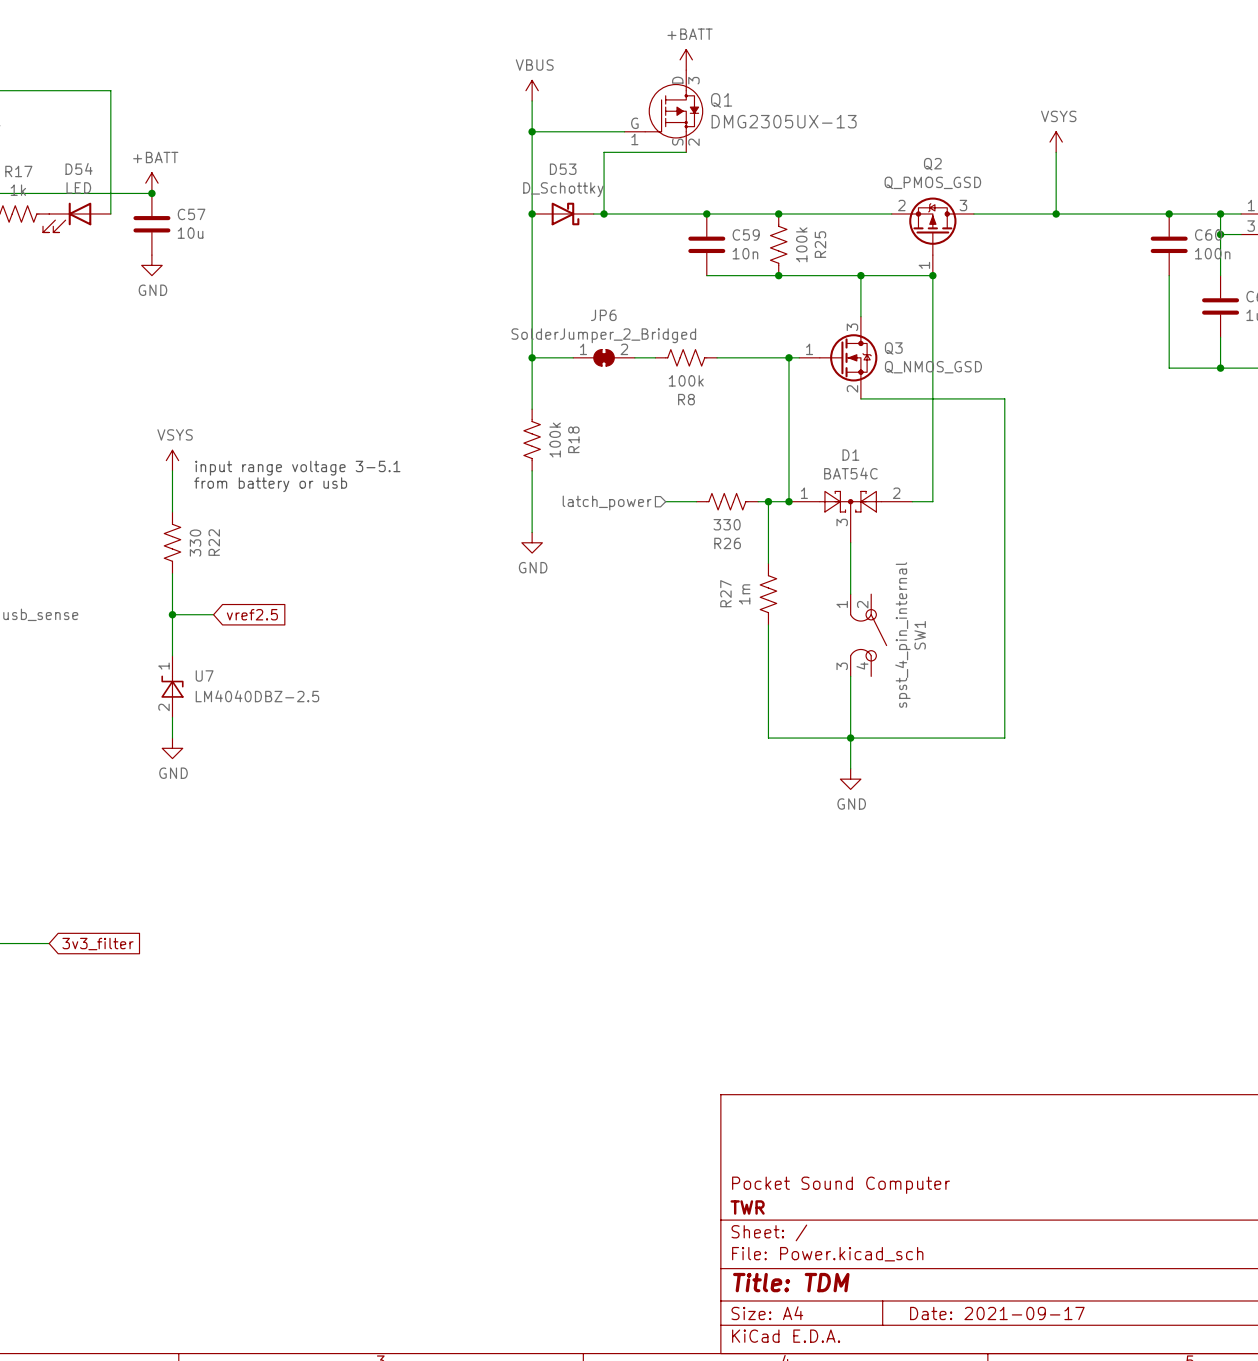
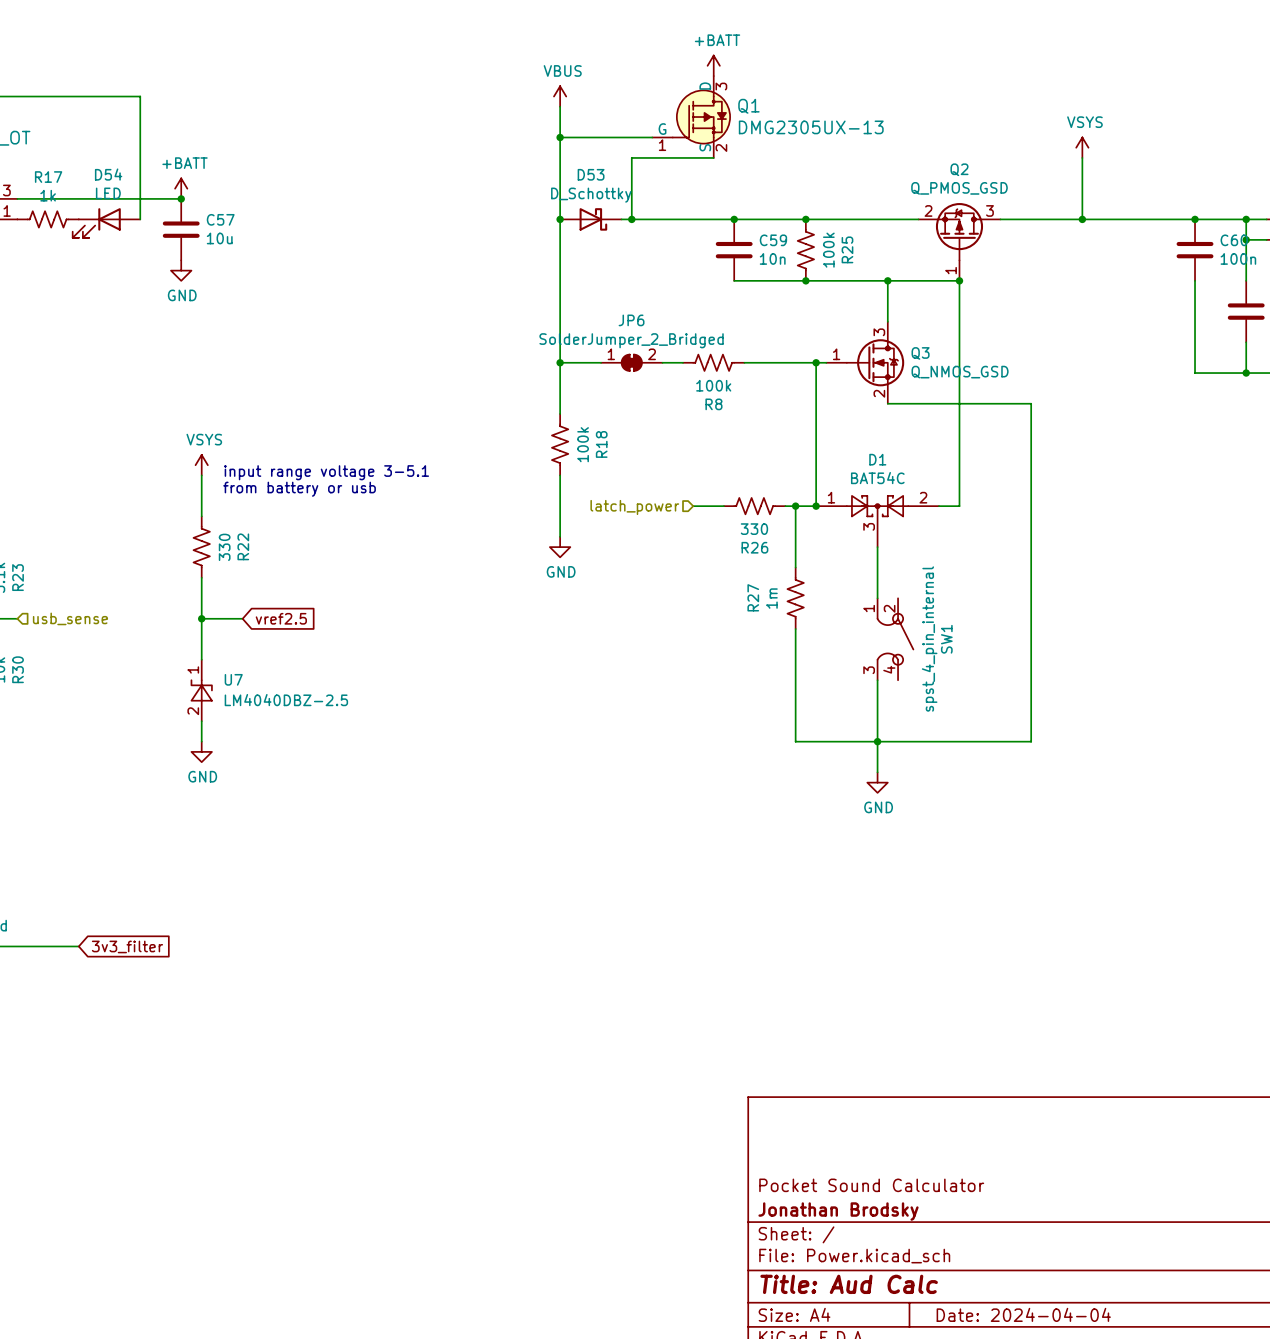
title block: Pocket Sound Computer (841, 1185) -> Pocket Sound Calculator (871, 1185)
title block: TWR (747, 1207) -> Jonathan Brodsky (838, 1211)
title block: Title: TDM (791, 1282) -> Title: Aud Calc (849, 1284)
title block: Date: 2021-09-17 (997, 1313) -> Date: 2024-04-04 (1023, 1314)

